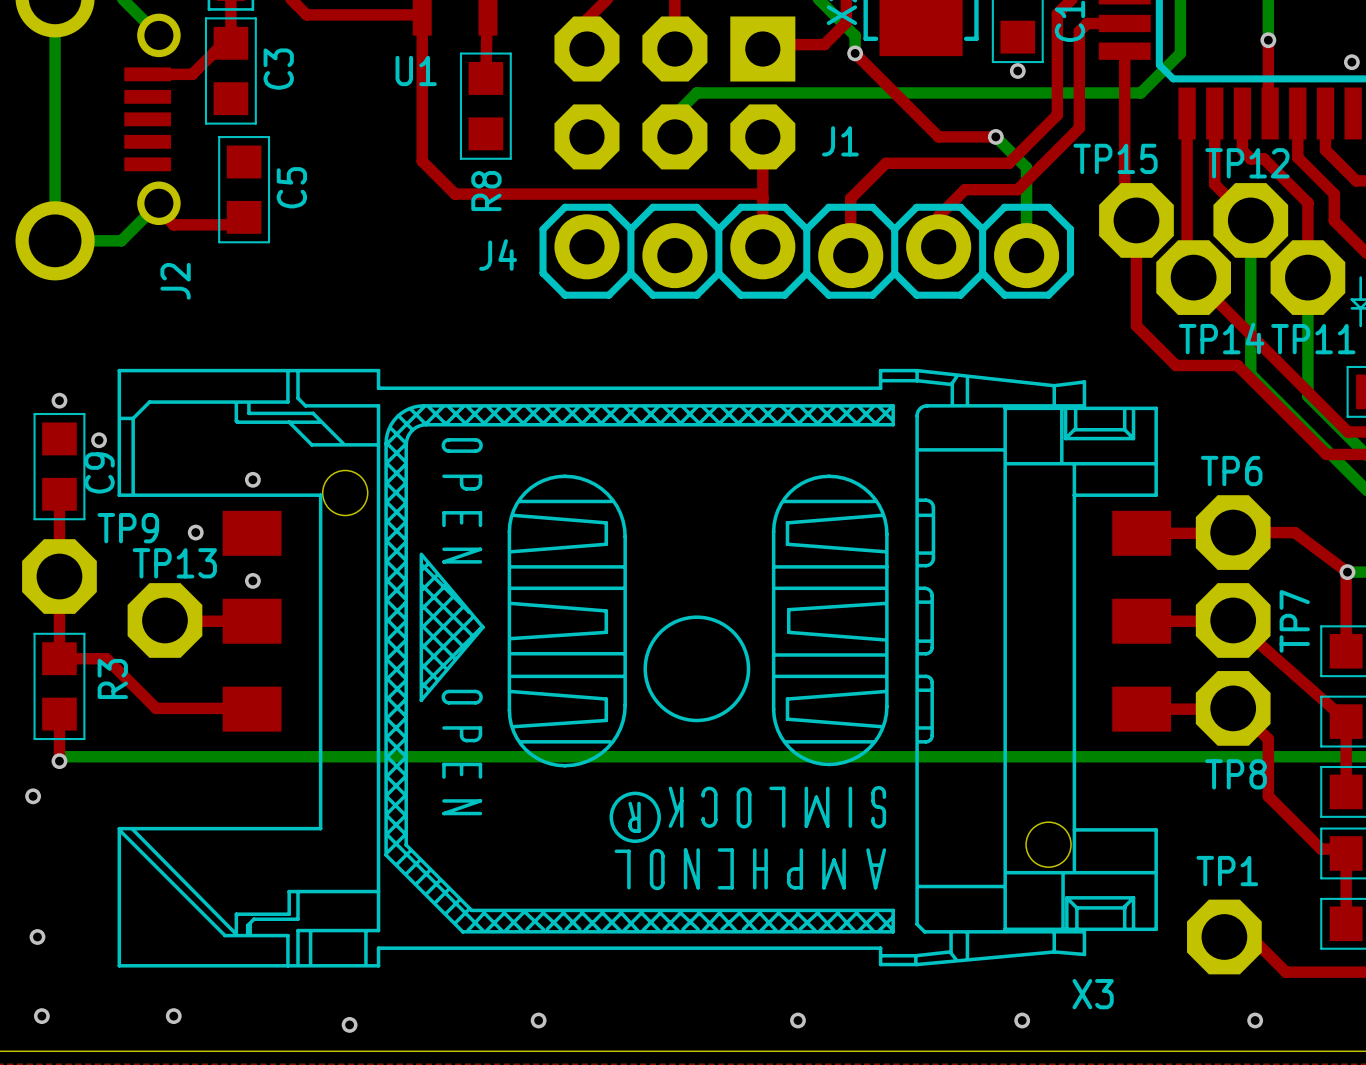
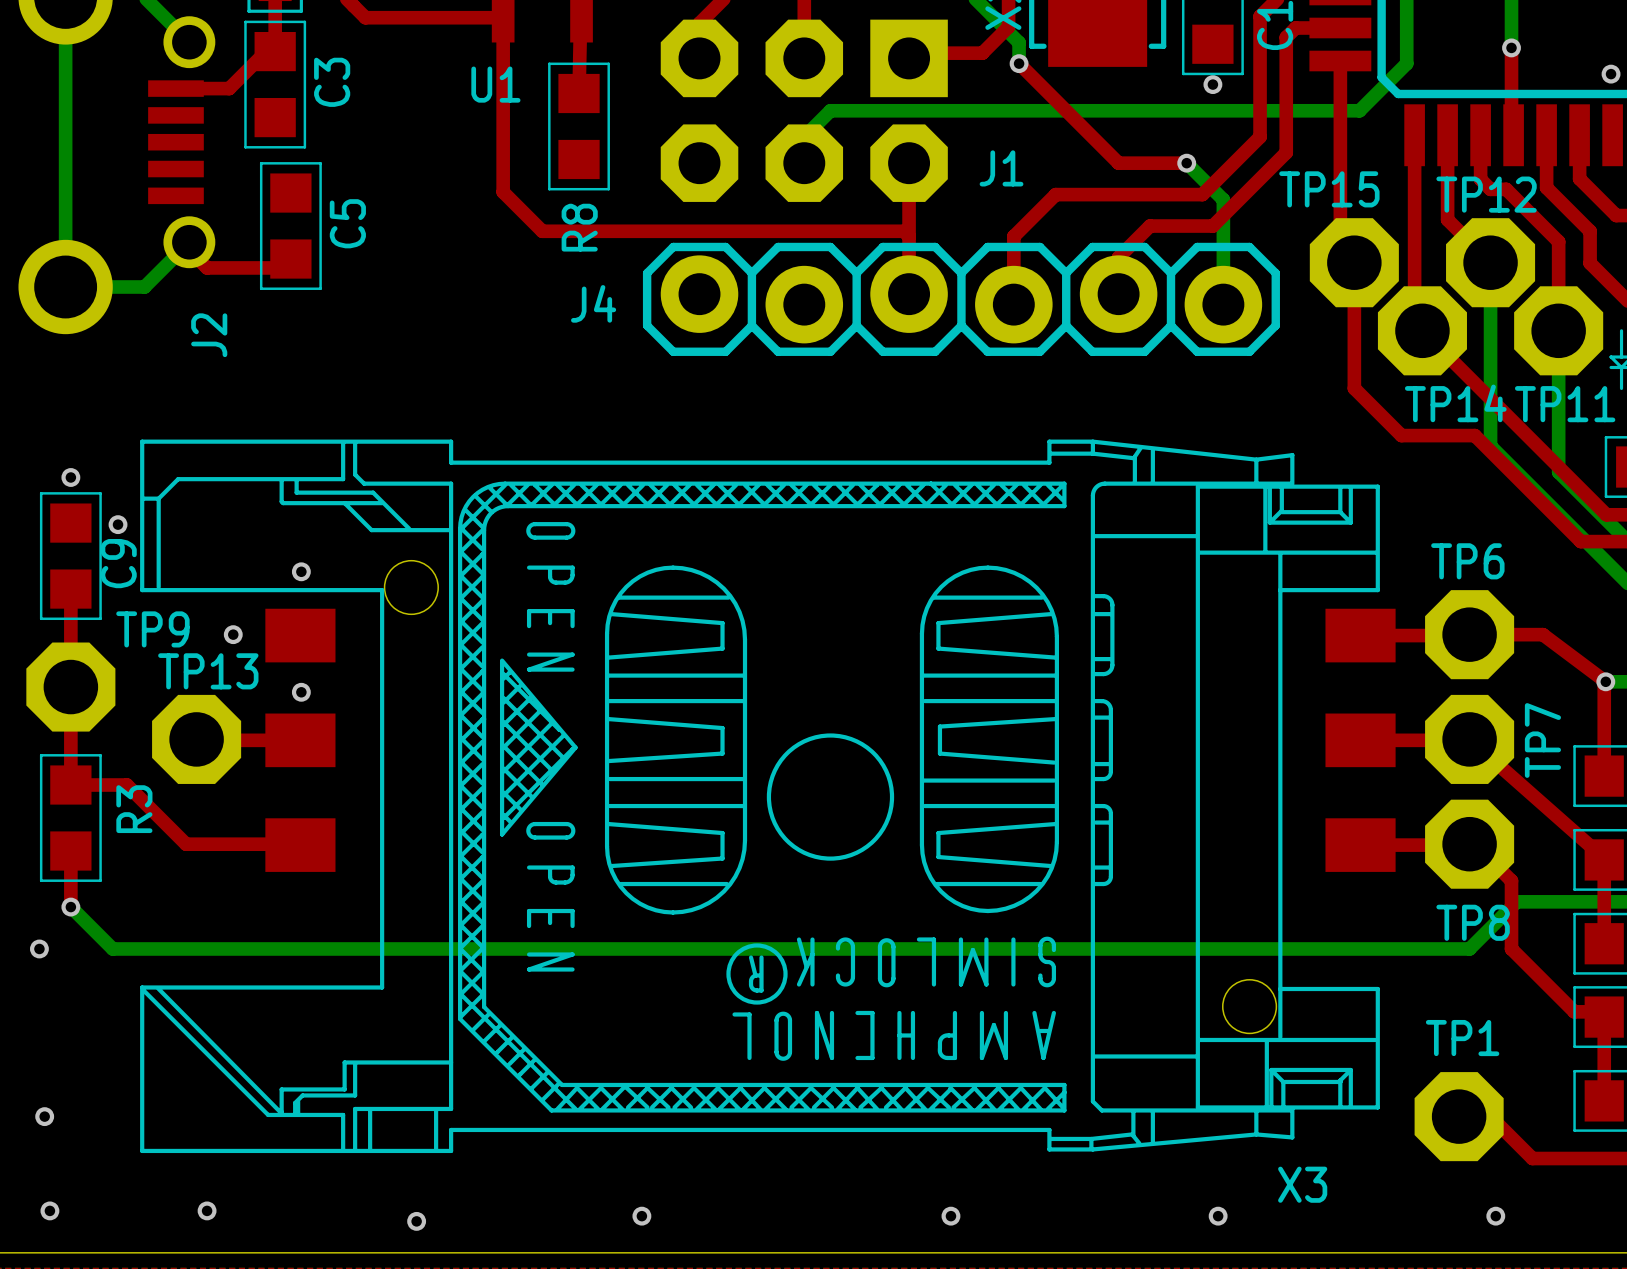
bottom track: (1272, 756) (63, 756) (59, 761) -> (1516, 901) (1469, 948) (112, 948) (70, 907)

